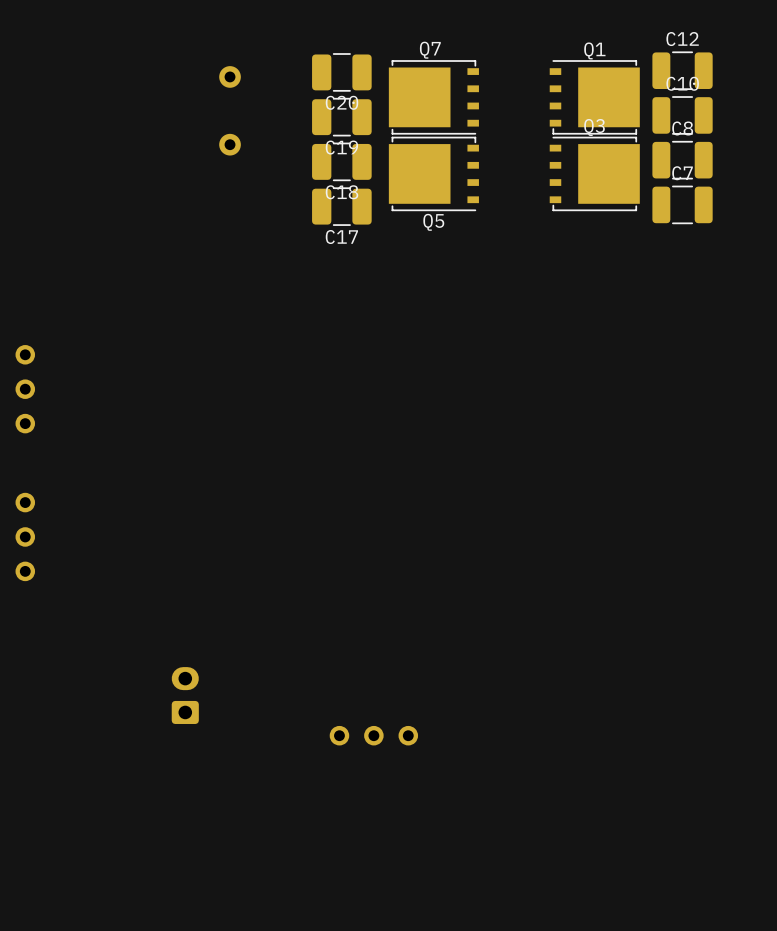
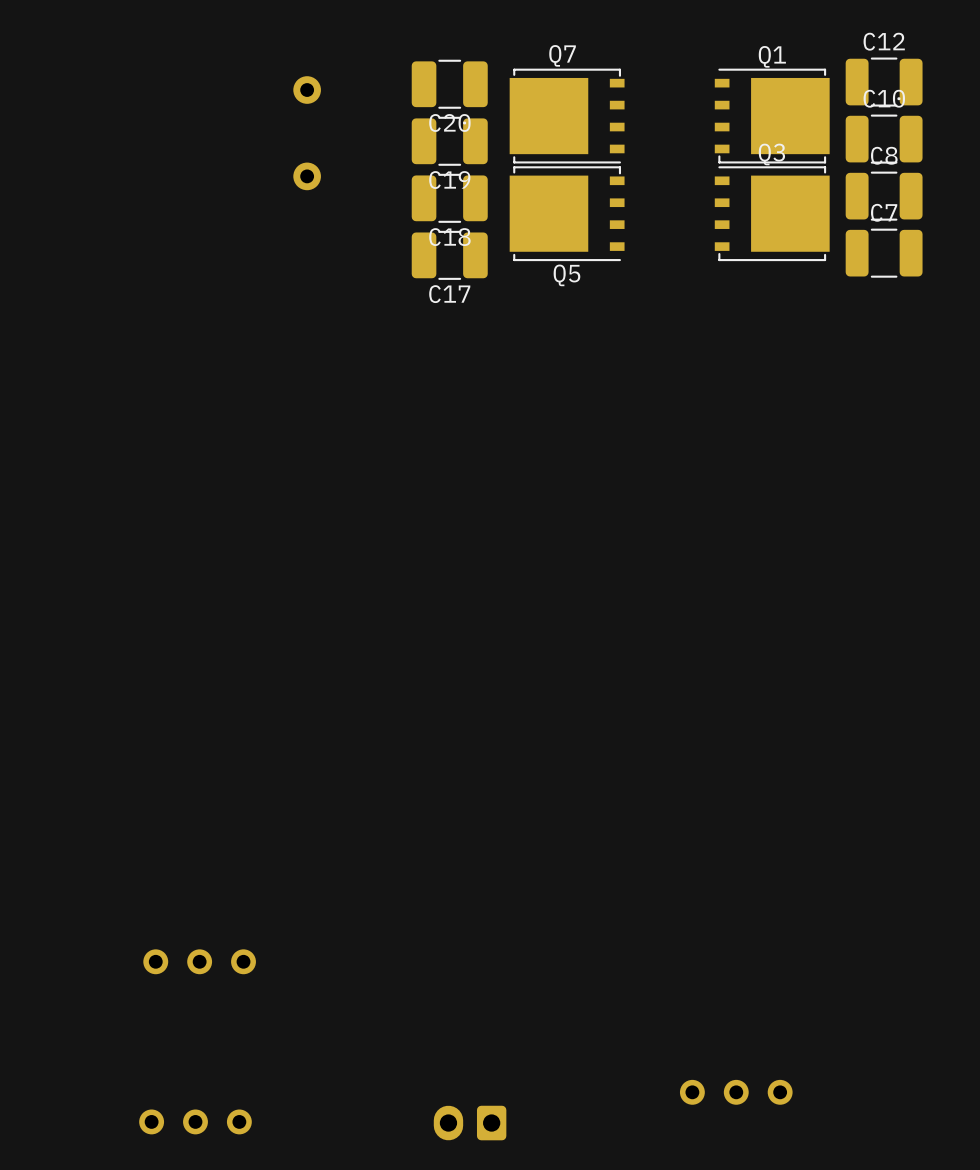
part: (25, 389) -> none
part: (25, 536) -> none
part rotation: 0° (185, 695) -> 90° counterclockwise (470, 1123)
part position: (185, 695) -> (470, 1123)
part: (373, 735) -> none
part: none -> (199, 961)
part: none -> (736, 1092)
part: none -> (195, 1121)

